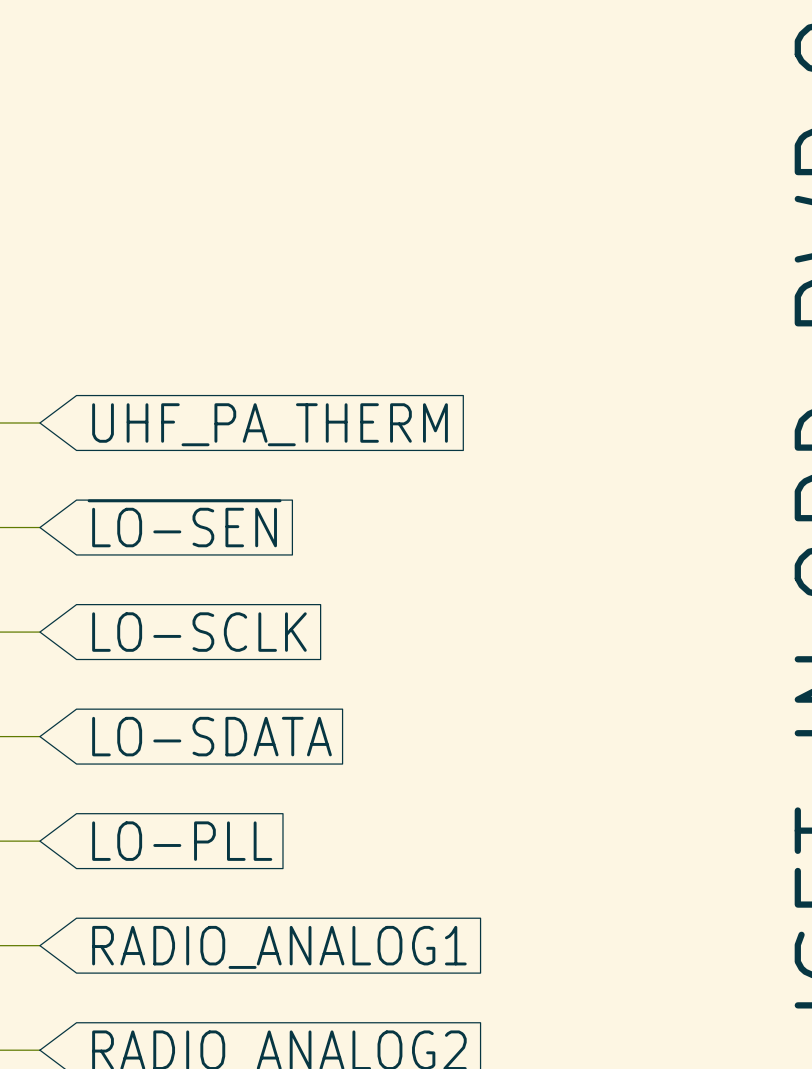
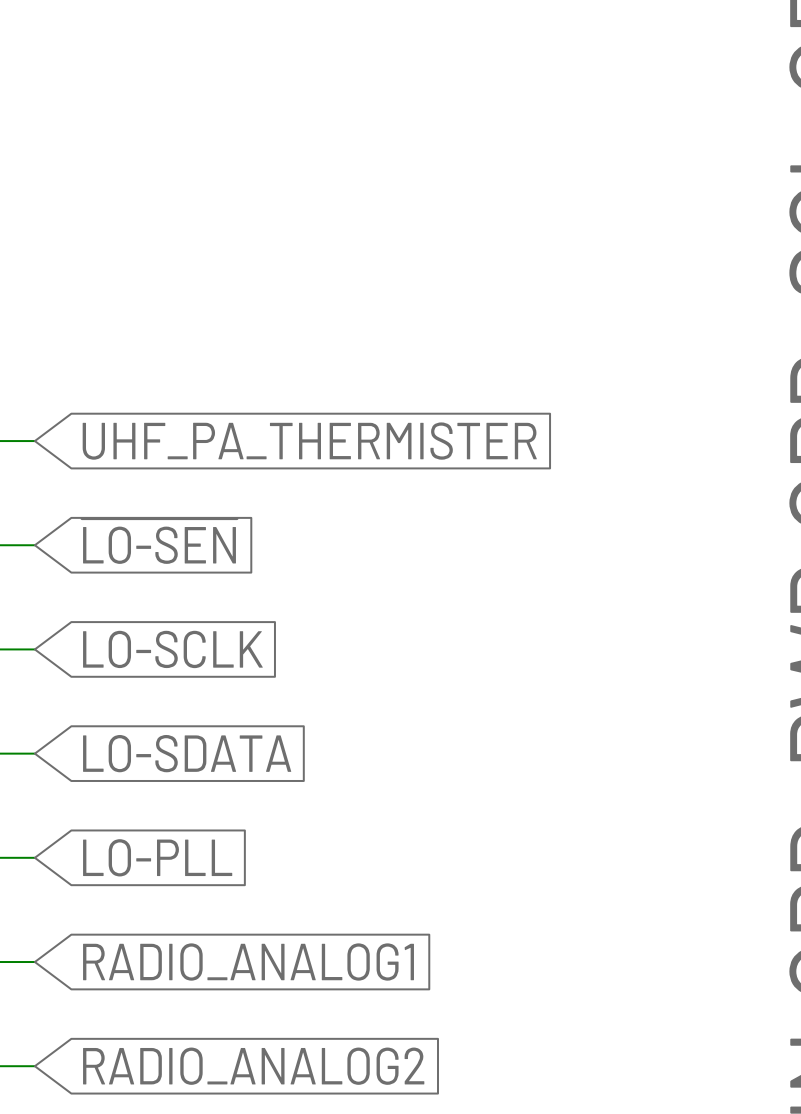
global label: UHF_PA_THERM (270, 424) -> UHF_PA_THERMISTER (309, 441)

